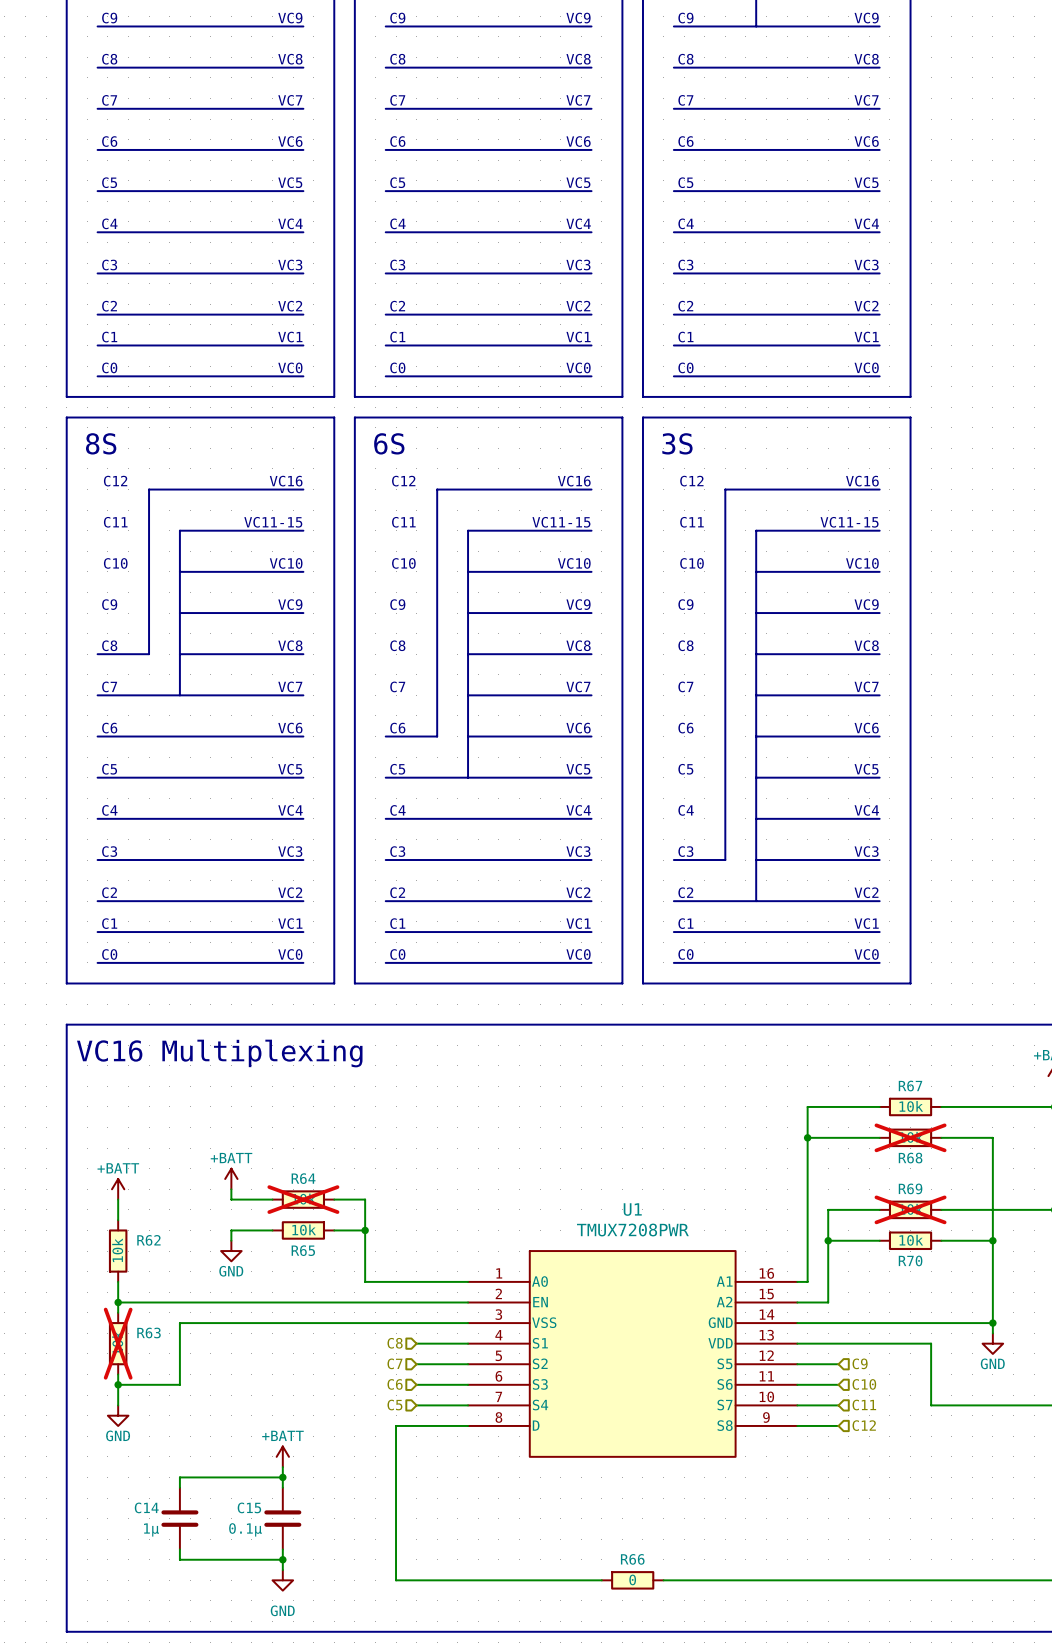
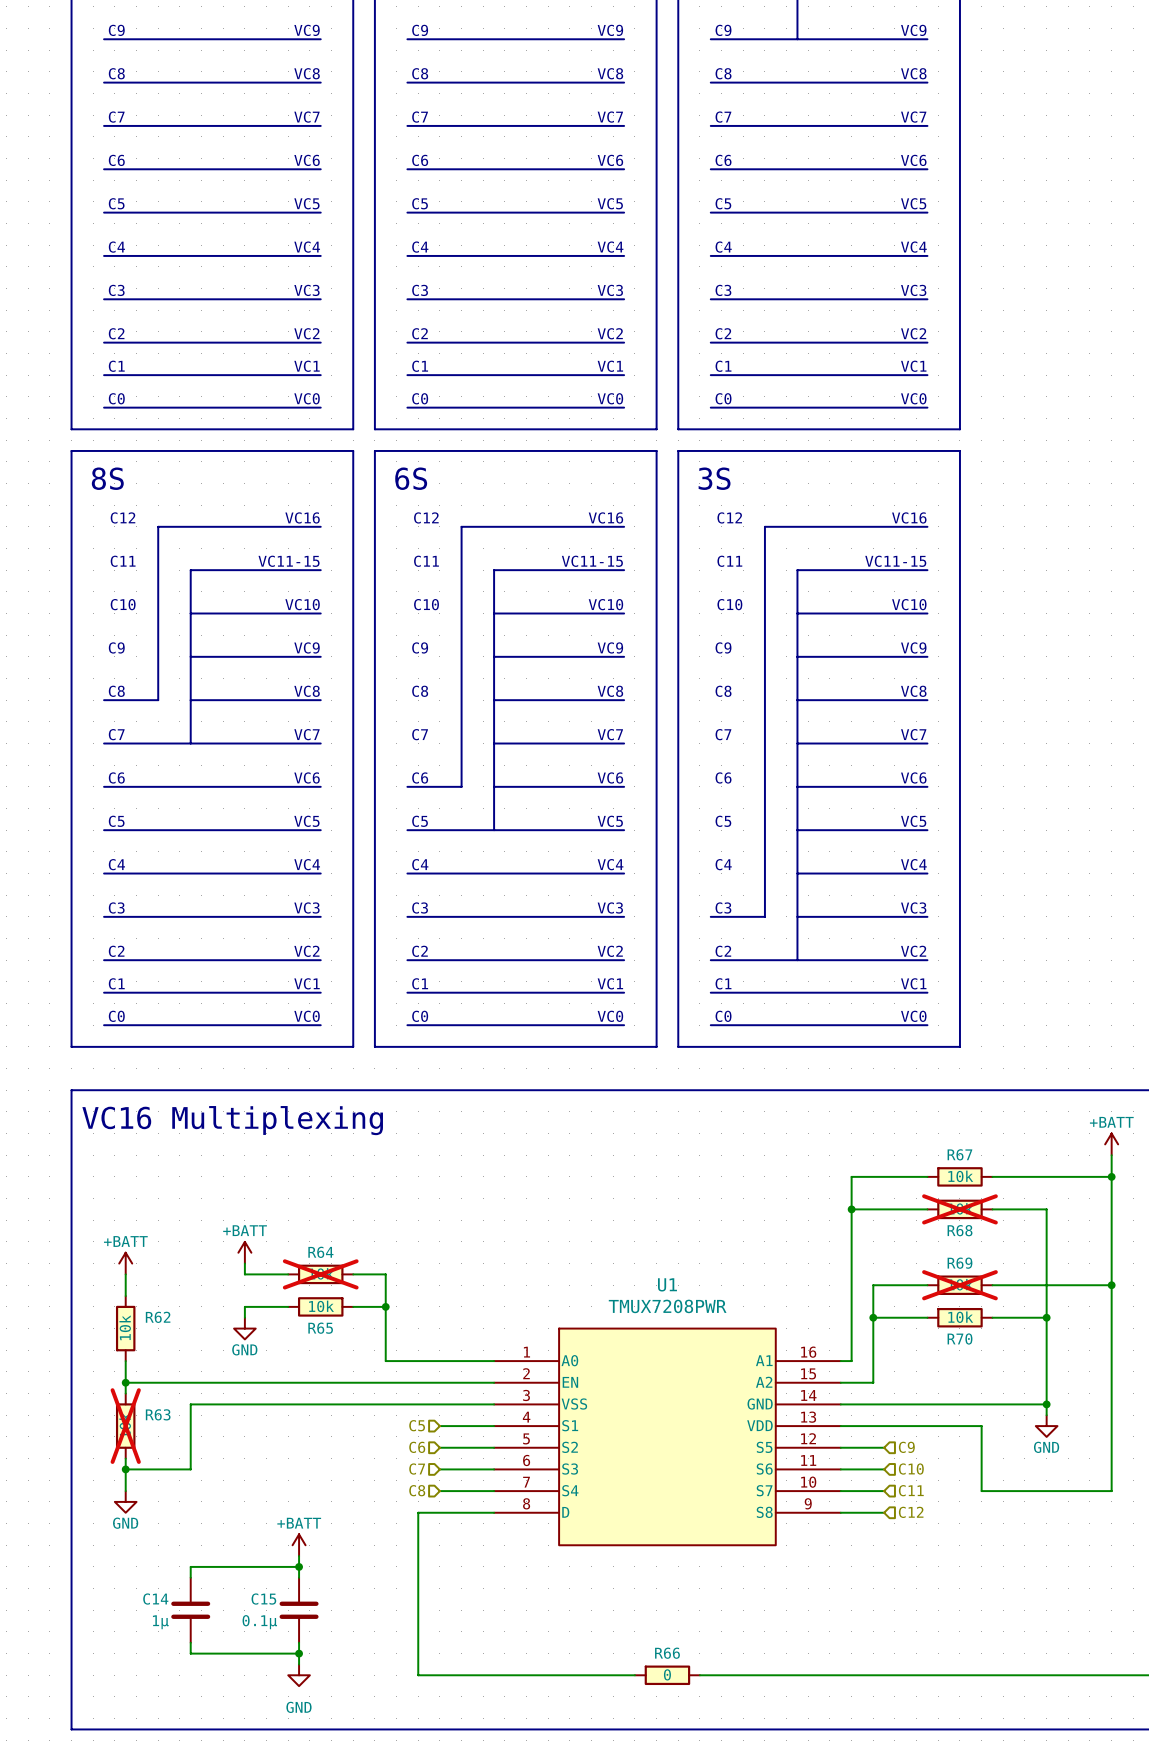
hierarchical label: C8 (395, 1343) -> C5 (417, 1425)
hierarchical label: C7 (394, 1363) -> C6 (417, 1447)
hierarchical label: C6 (395, 1384) -> C7 (417, 1469)
hierarchical label: C5 (394, 1405) -> C8 (417, 1490)

